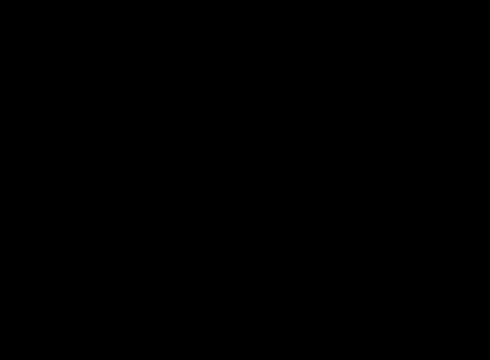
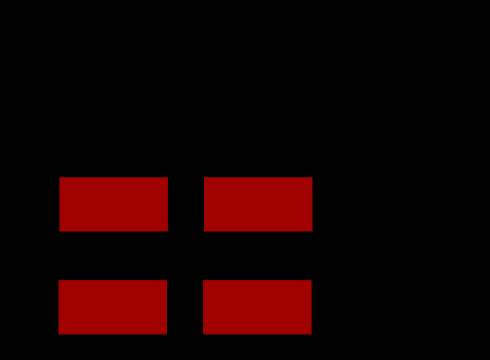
part: none -> (185, 204)
part: none -> (185, 307)

